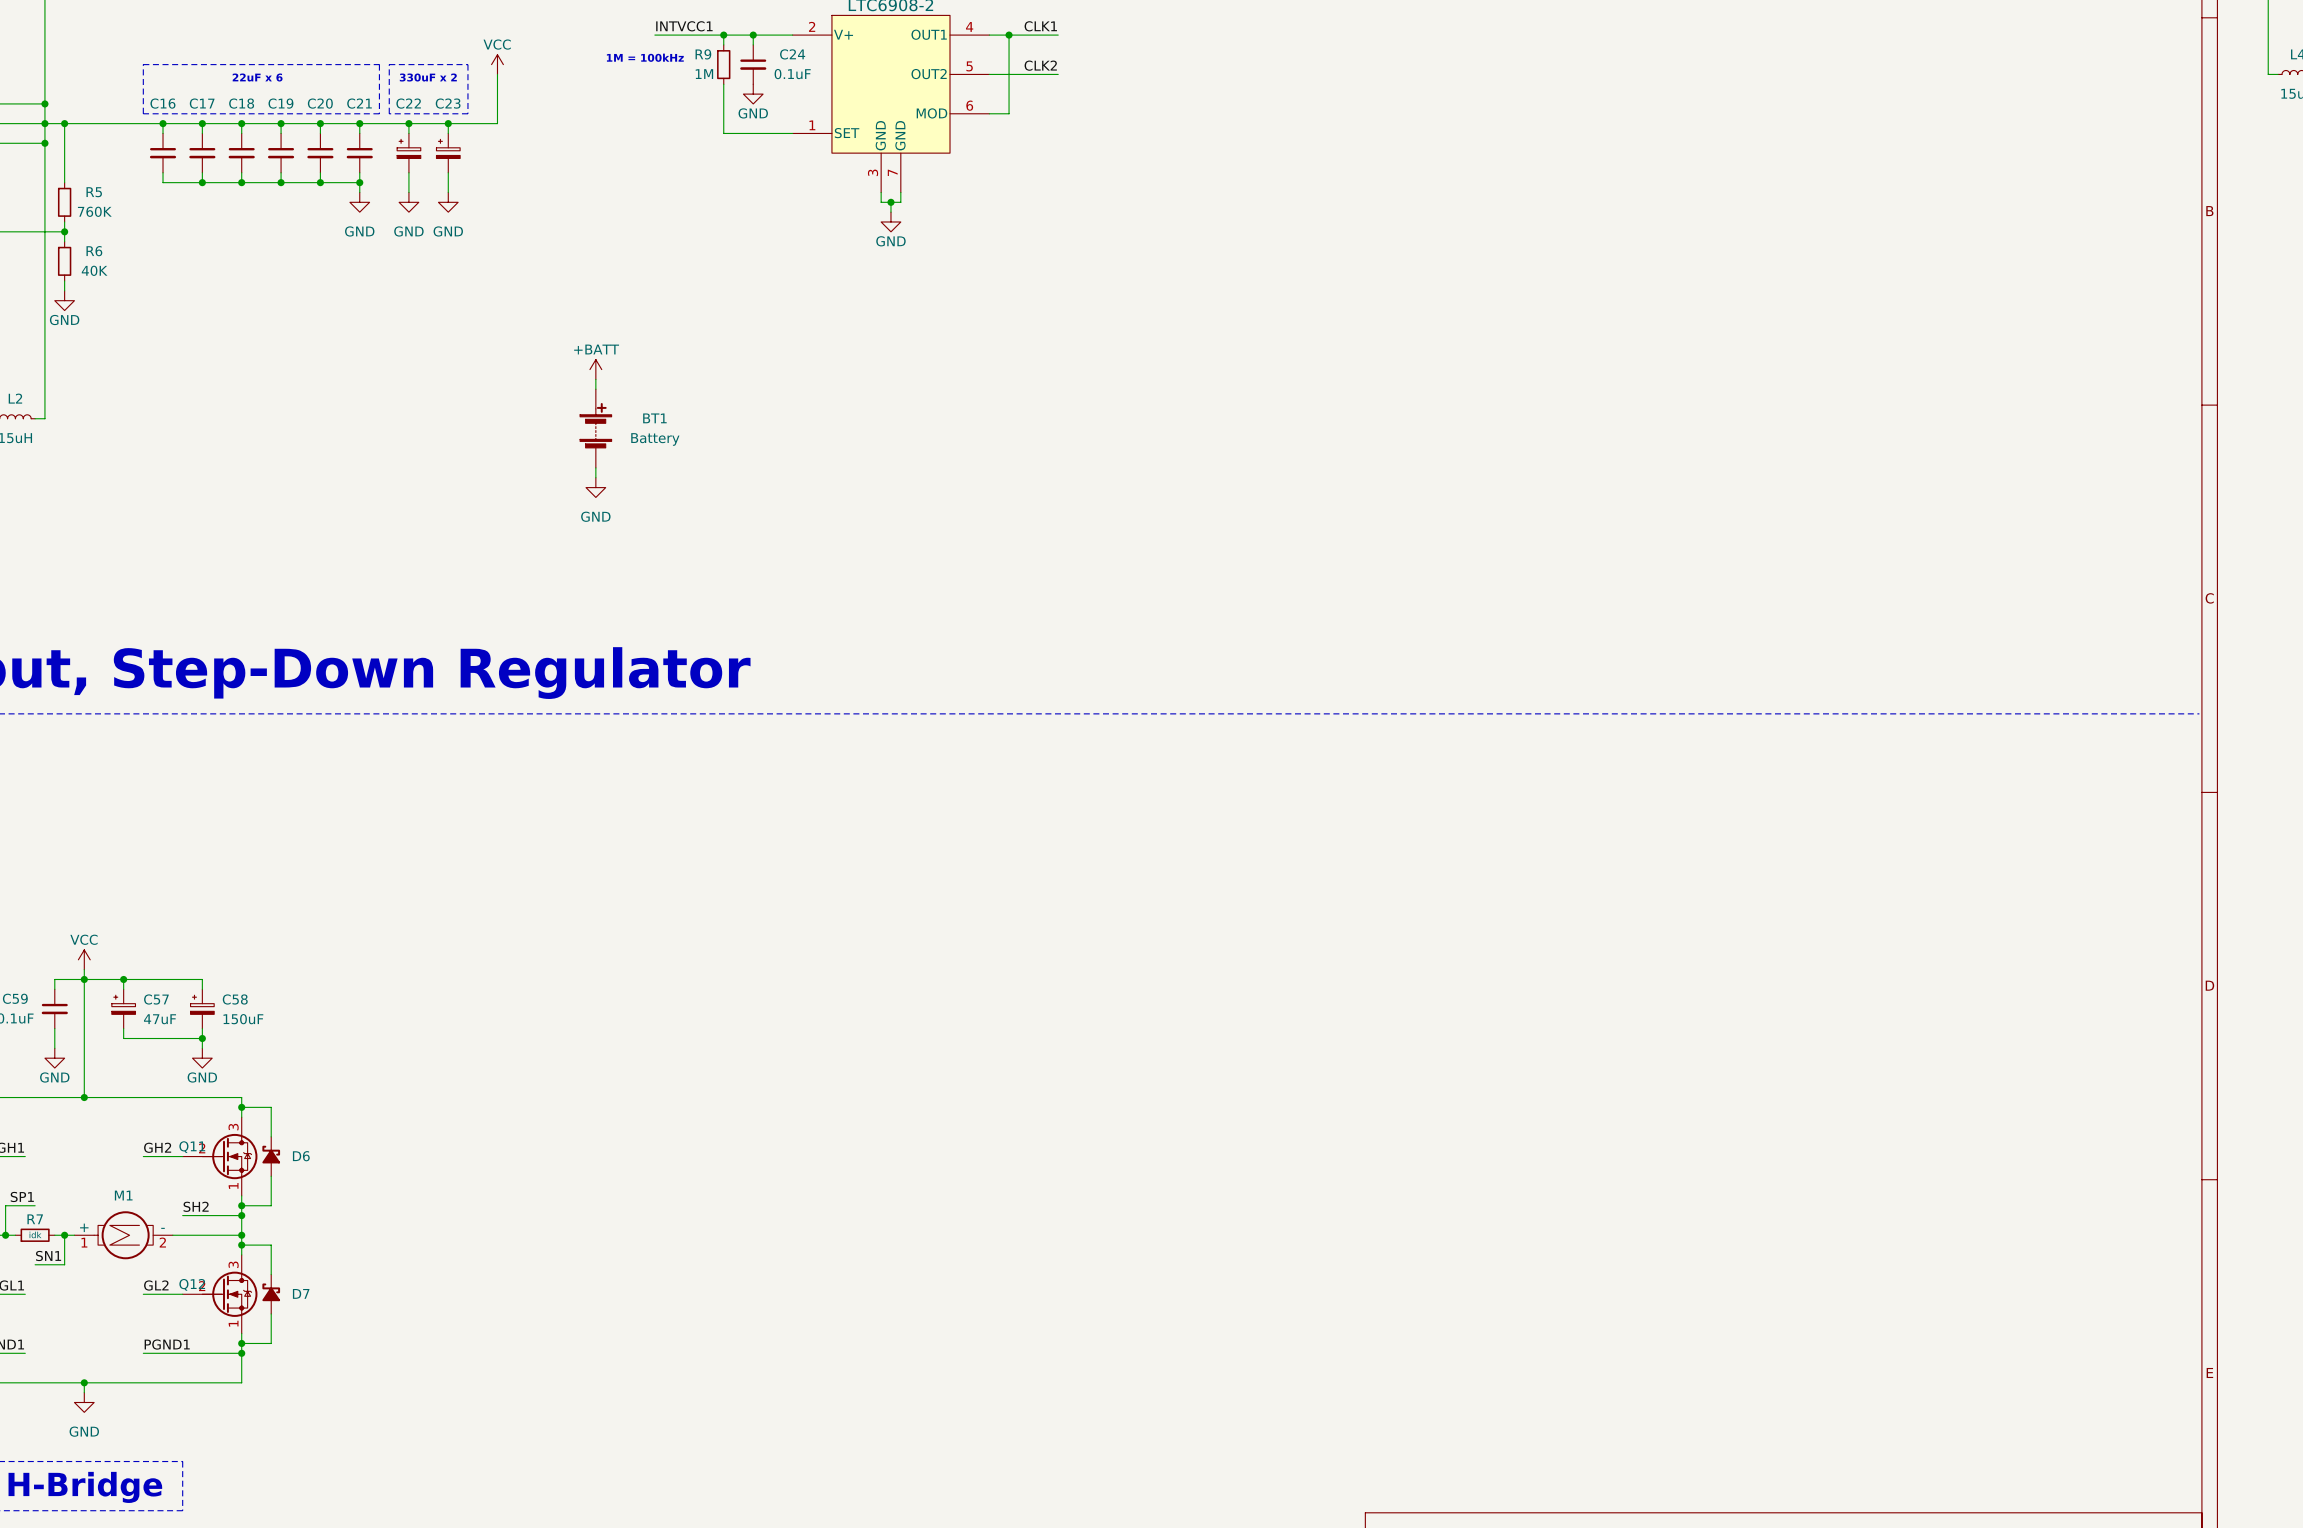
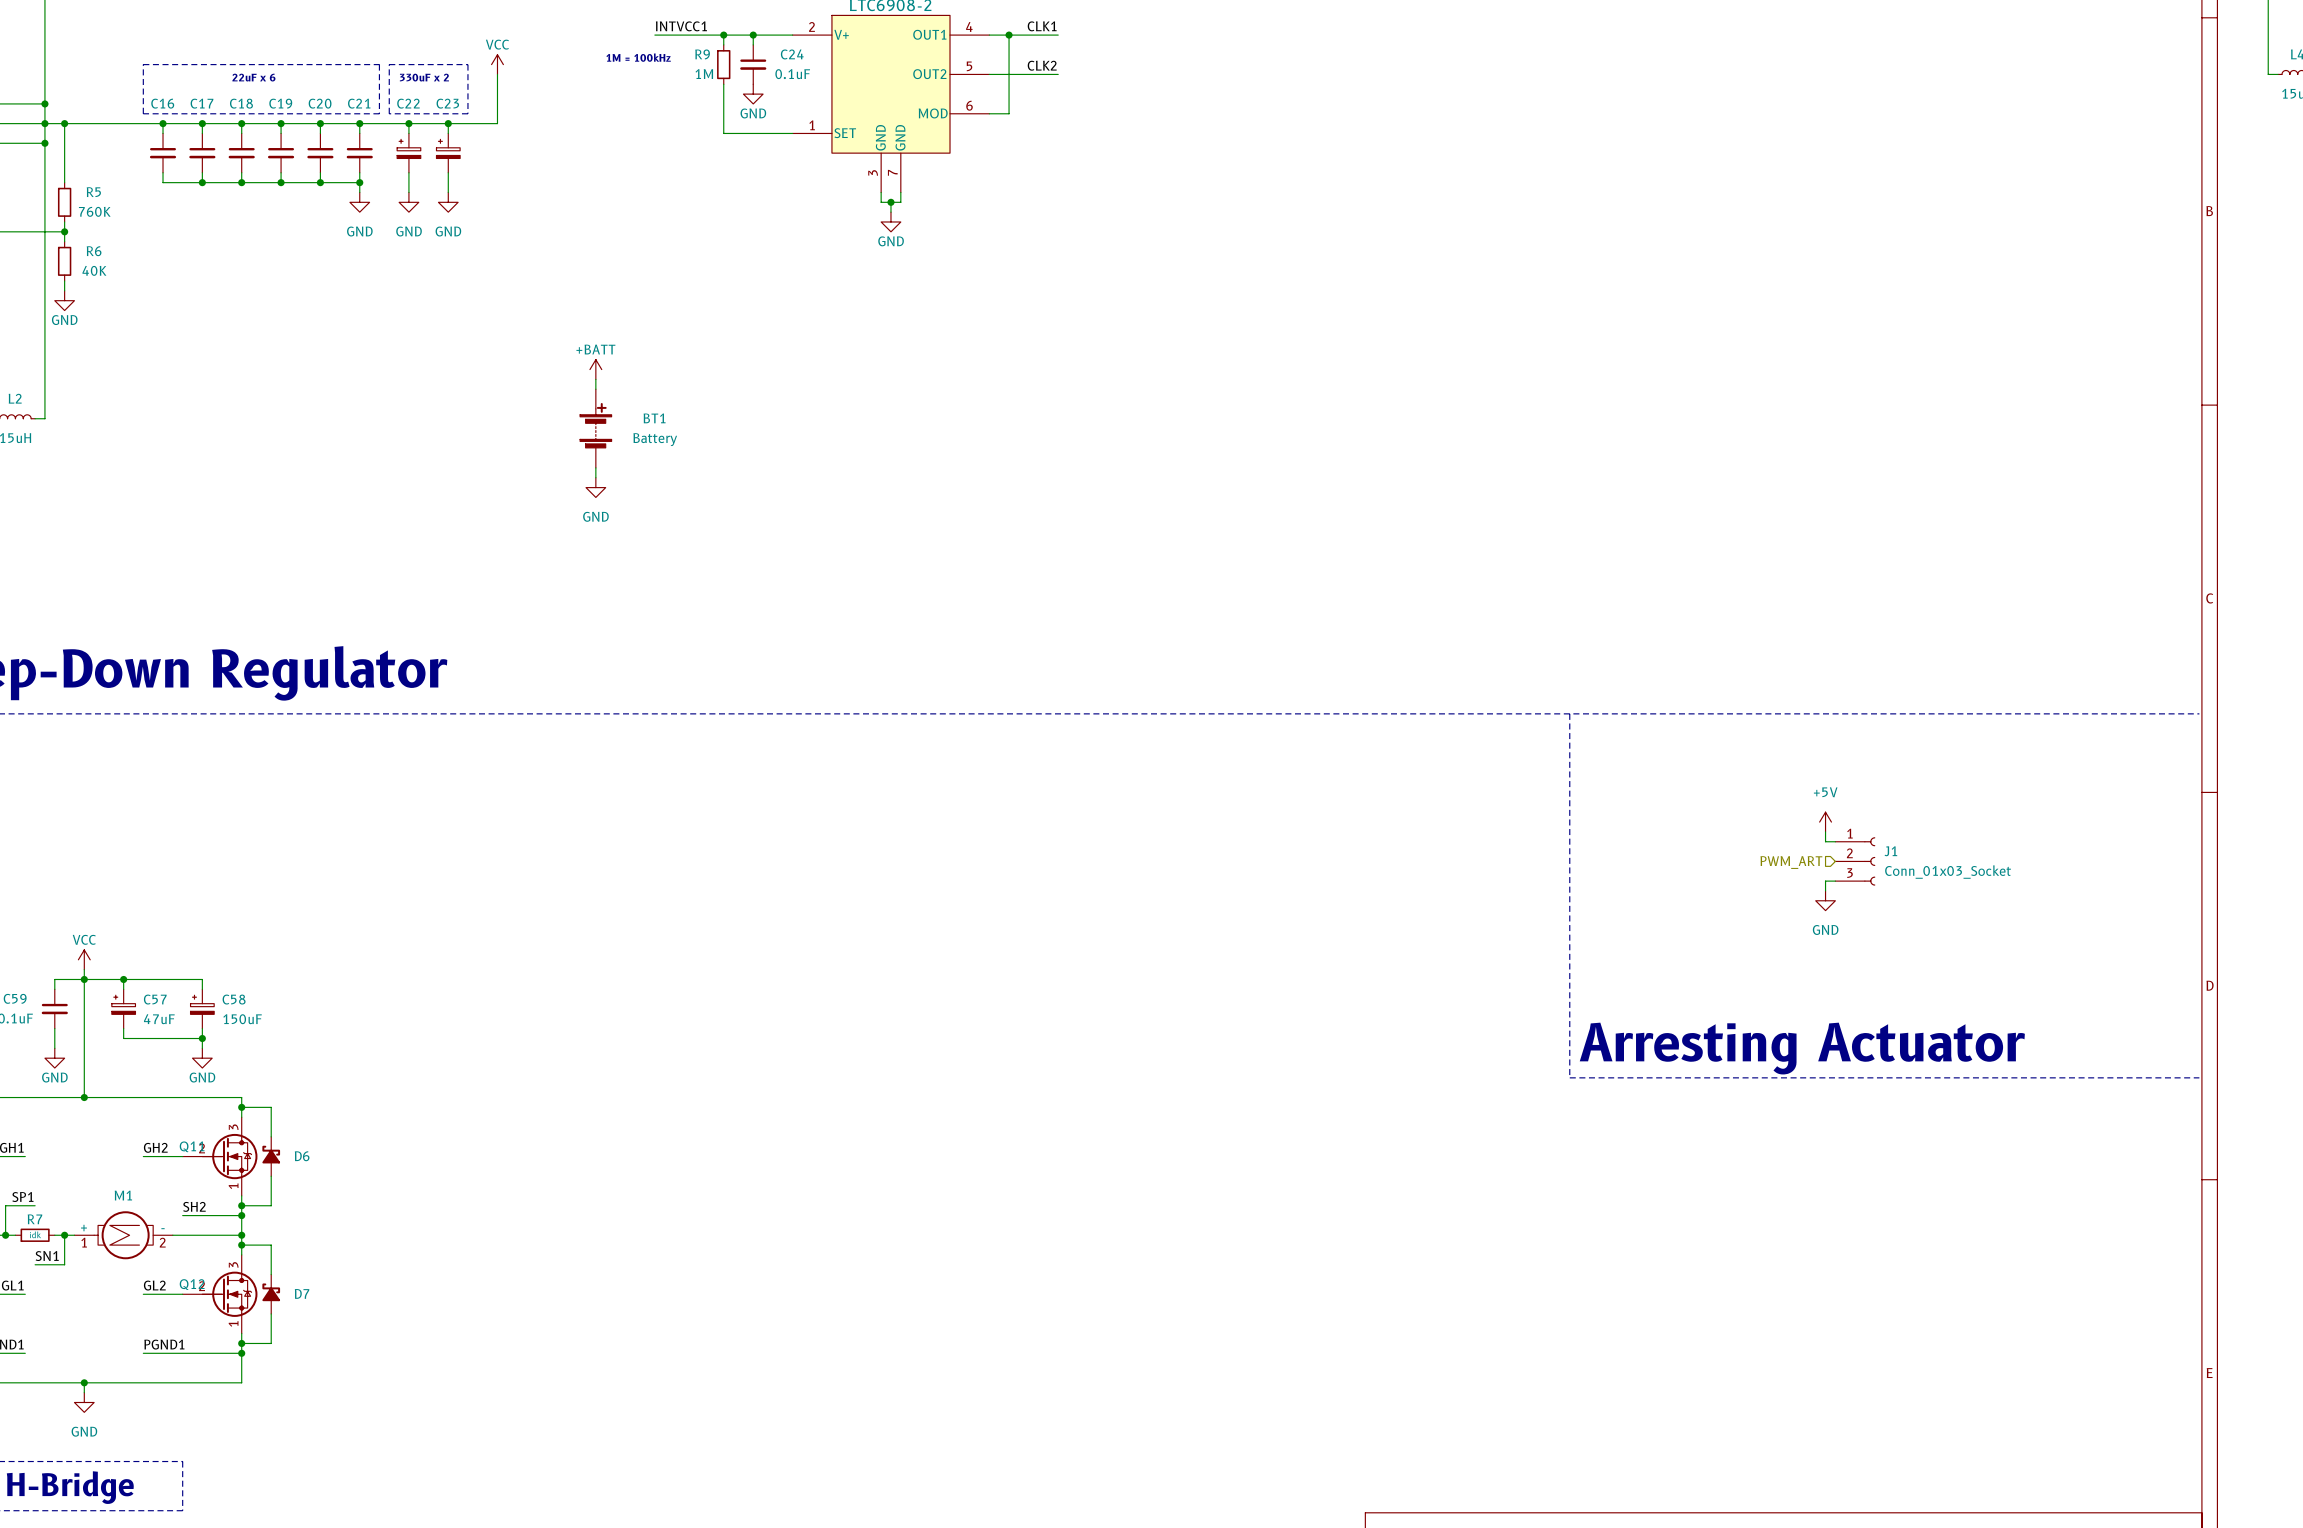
line: none -> (1569, 713) (1569, 1077) (2199, 1077)
power symbol: none -> +5V (1825, 822)
wire: none -> (1825, 831) (1825, 841) (1835, 841)
J1: none -> Conn_01x03_Socket (1855, 861)
hierarchical label: none -> PWM_ART (1791, 862)
wire: none -> (1835, 881) (1825, 881) (1825, 890)
power symbol: none -> GND (1825, 900)
text: none -> Arresting Actuator (1802, 1048)

